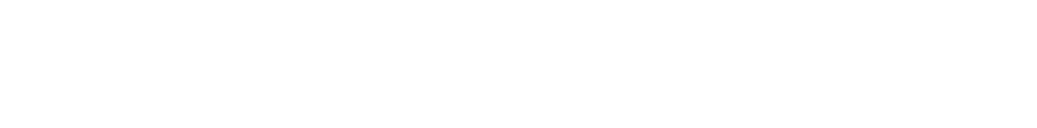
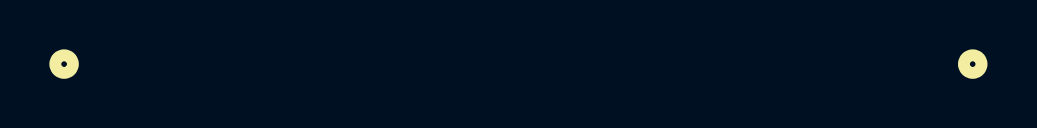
part: none -> (64, 64)
part: none -> (972, 64)

